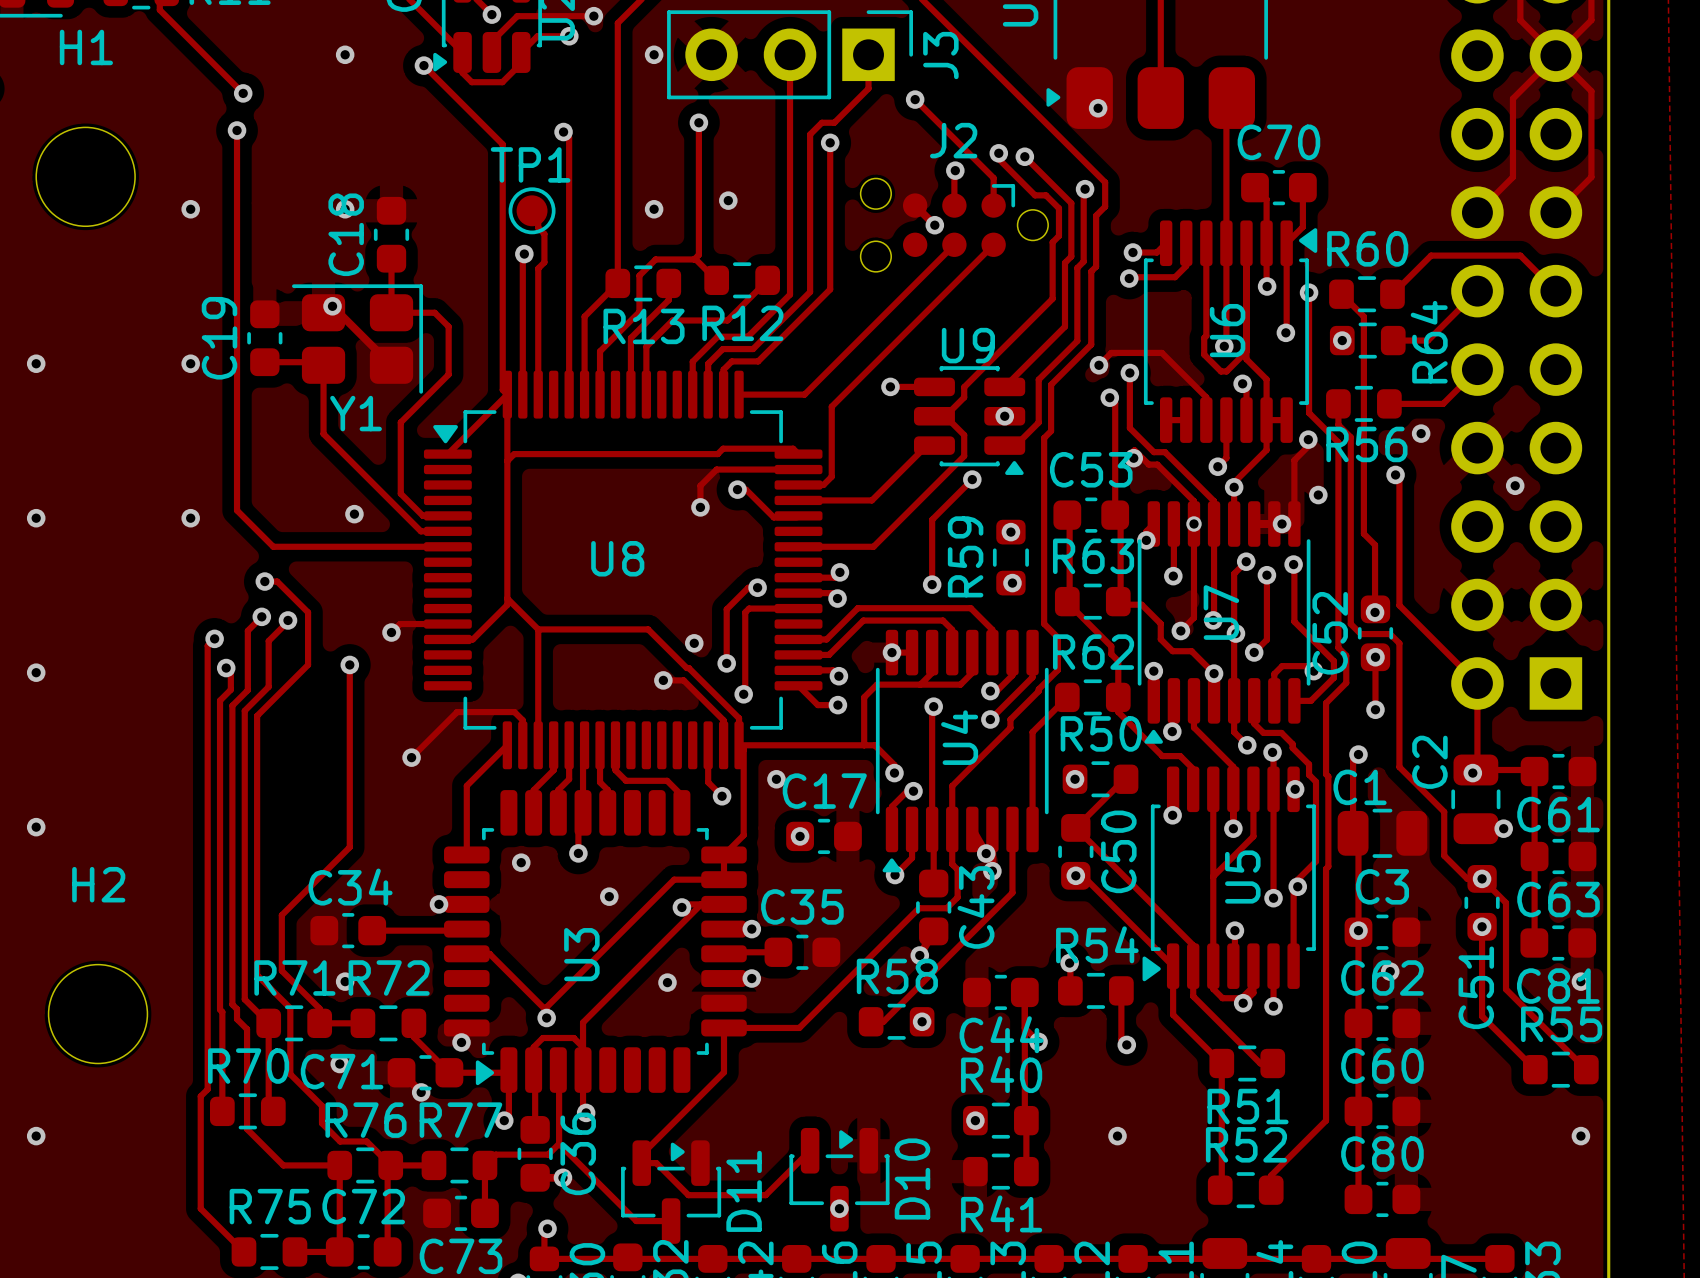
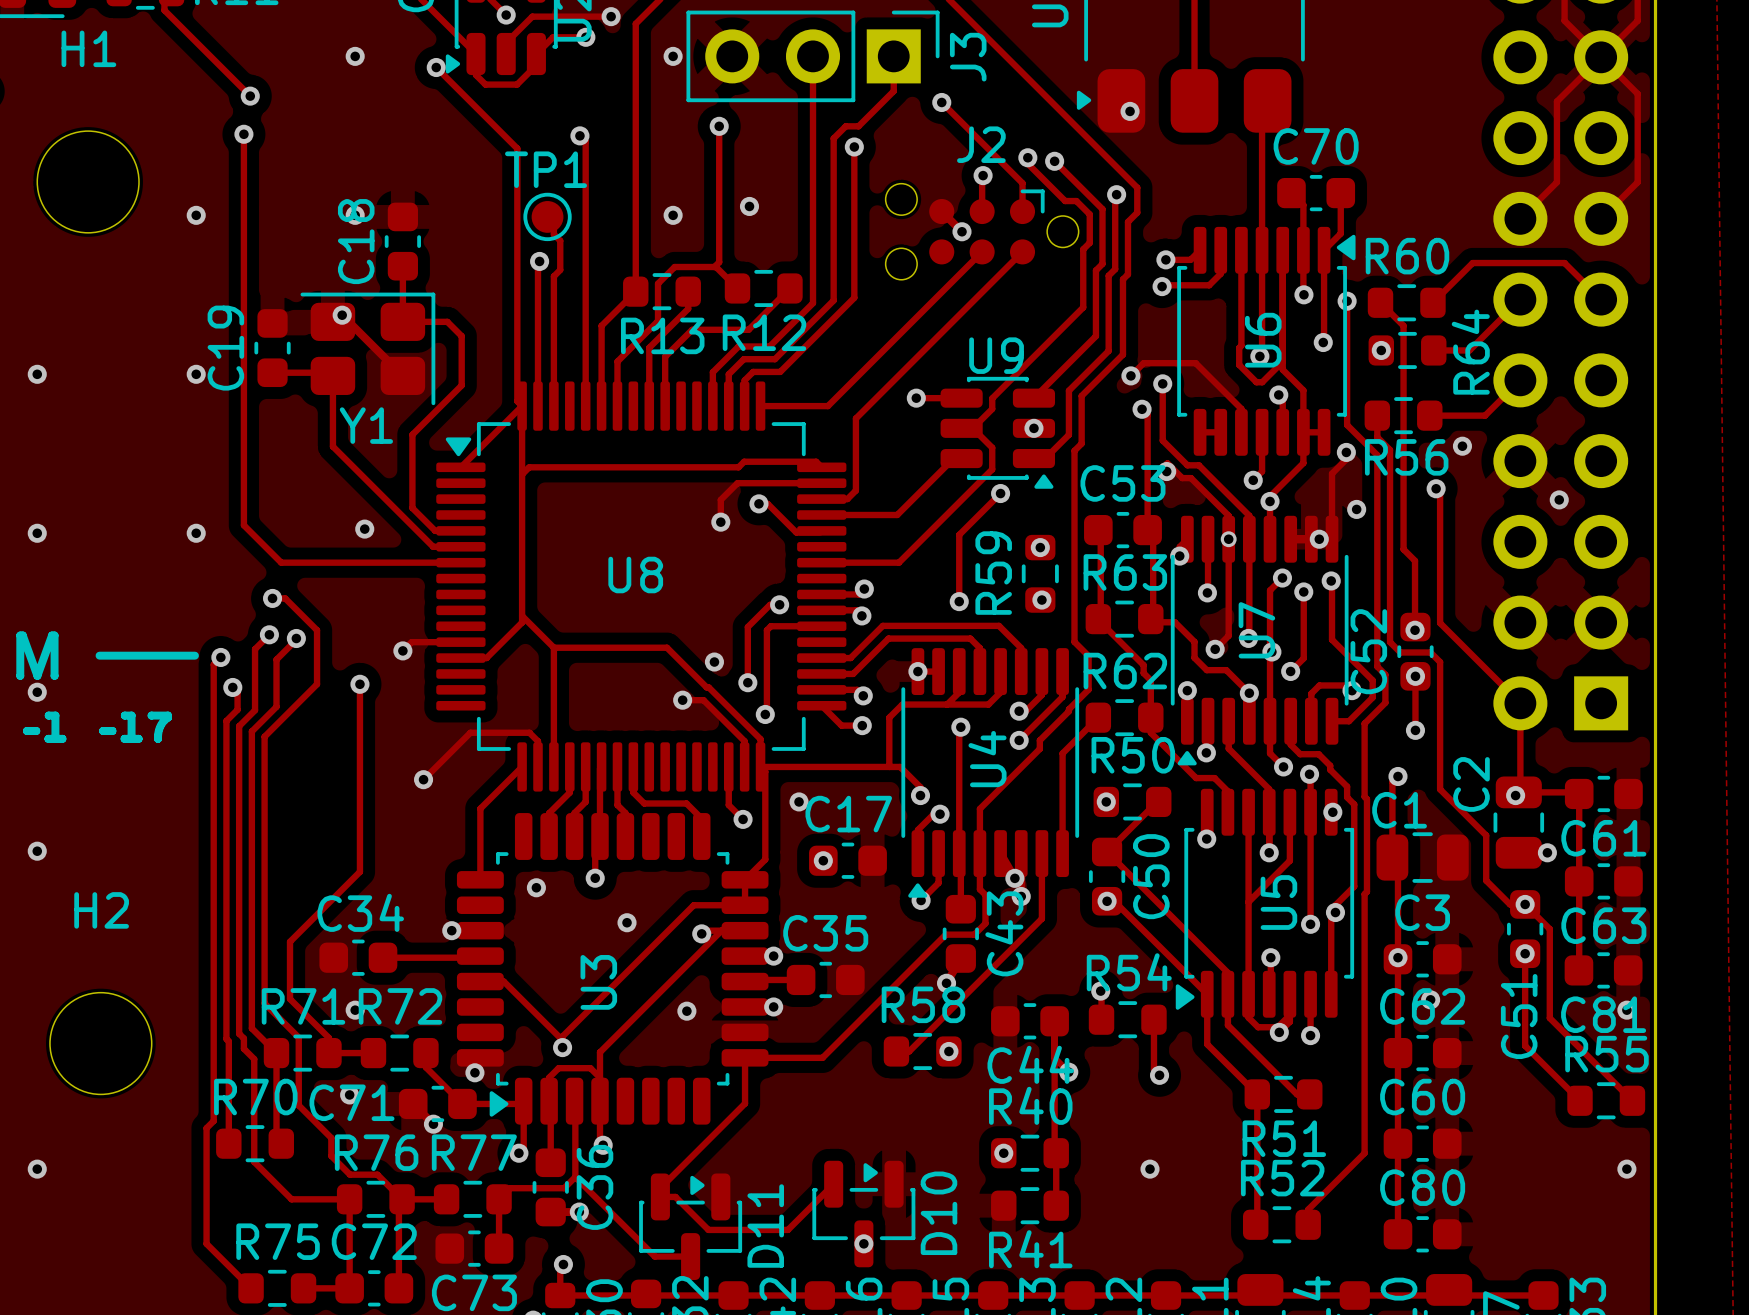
line: none -> (20, 635) (23, 635) (37, 674) (51, 635) (54, 635) (54, 676) (54, 636) (52, 636) (37, 676) (22, 636) (20, 636) (19, 676) (20, 635)
line: none -> (99, 655) (194, 655)
line: none -> (48, 715) (55, 715) (55, 738) (62, 739) (48, 738) (55, 738) (55, 715) (48, 715)
line: none -> (151, 715) (168, 715) (168, 717) (160, 727) (158, 739) (159, 727) (167, 715) (151, 715)
line: none -> (26, 730) (36, 730) (36, 730) (26, 731) (26, 730)
line: none -> (103, 730) (112, 730) (112, 730) (103, 731) (103, 730)
line: none -> (138, 739) (124, 738) (131, 738) (131, 715) (124, 715) (131, 715) (131, 738) (138, 738)

